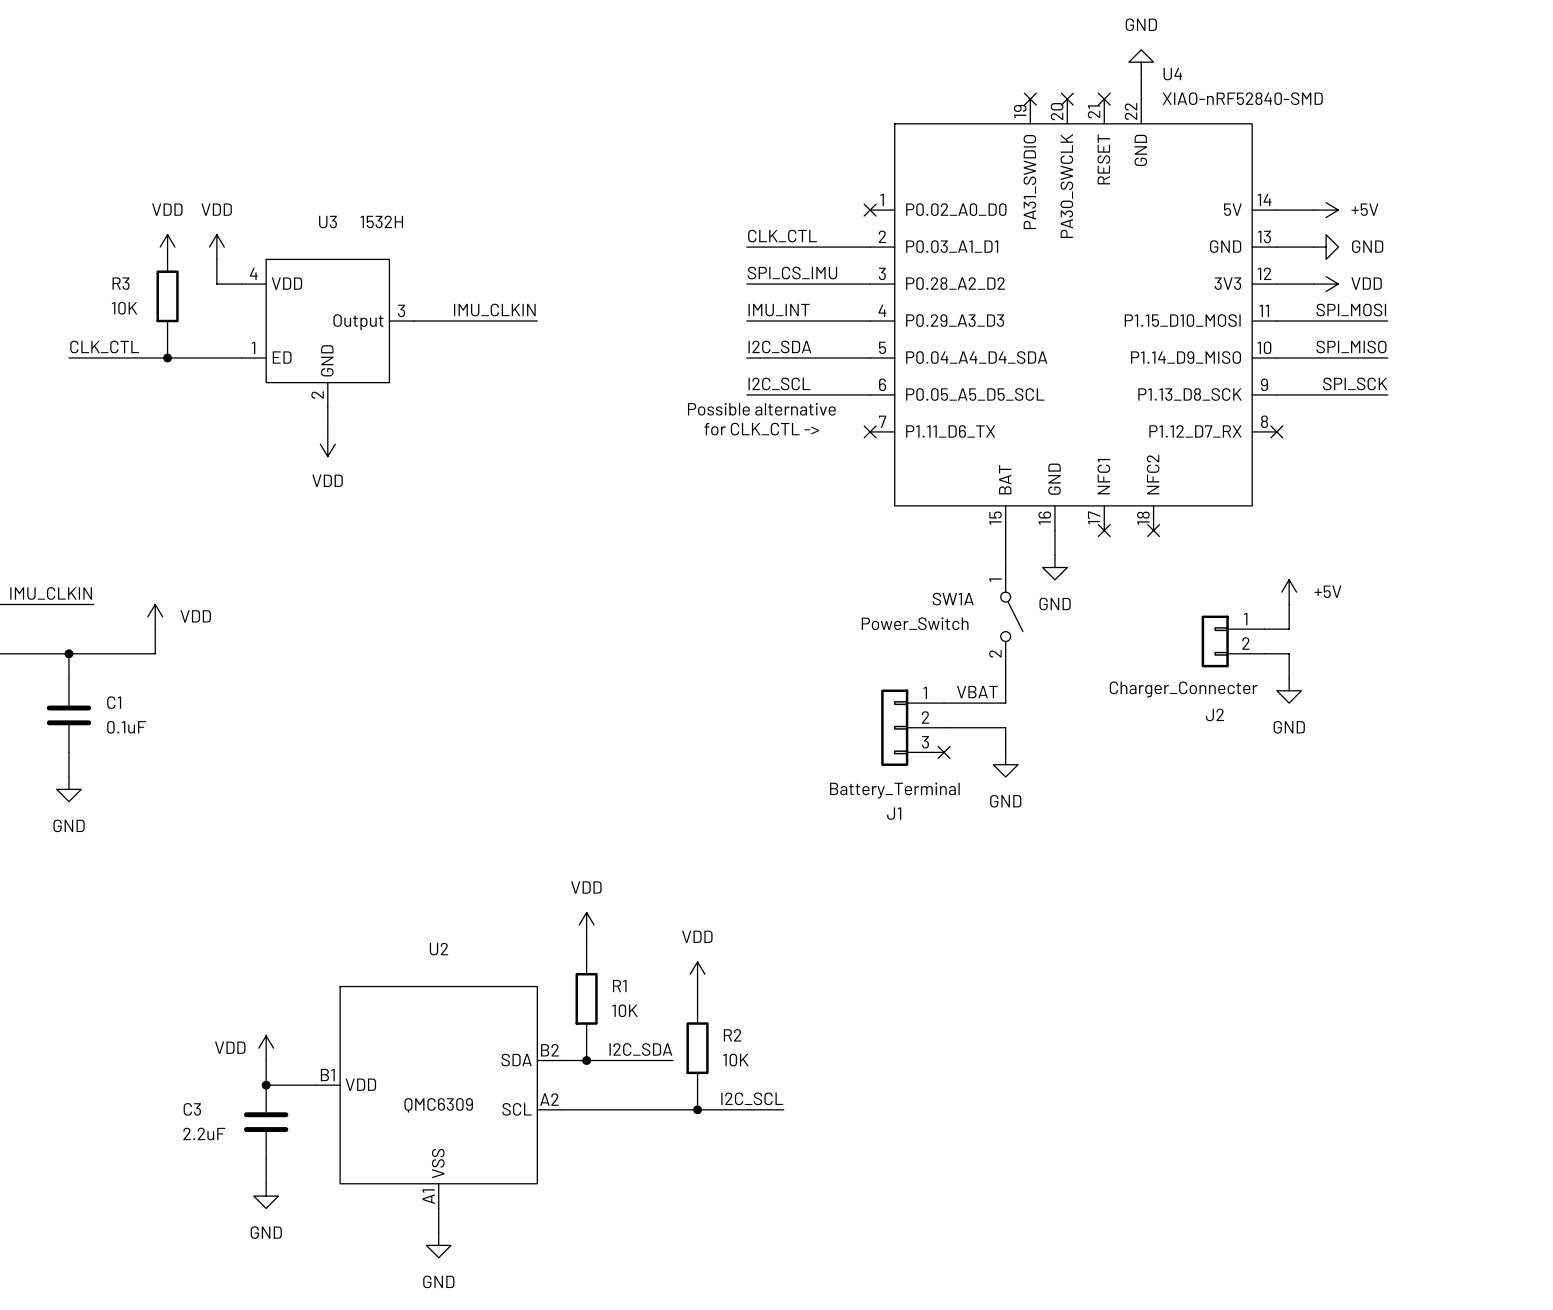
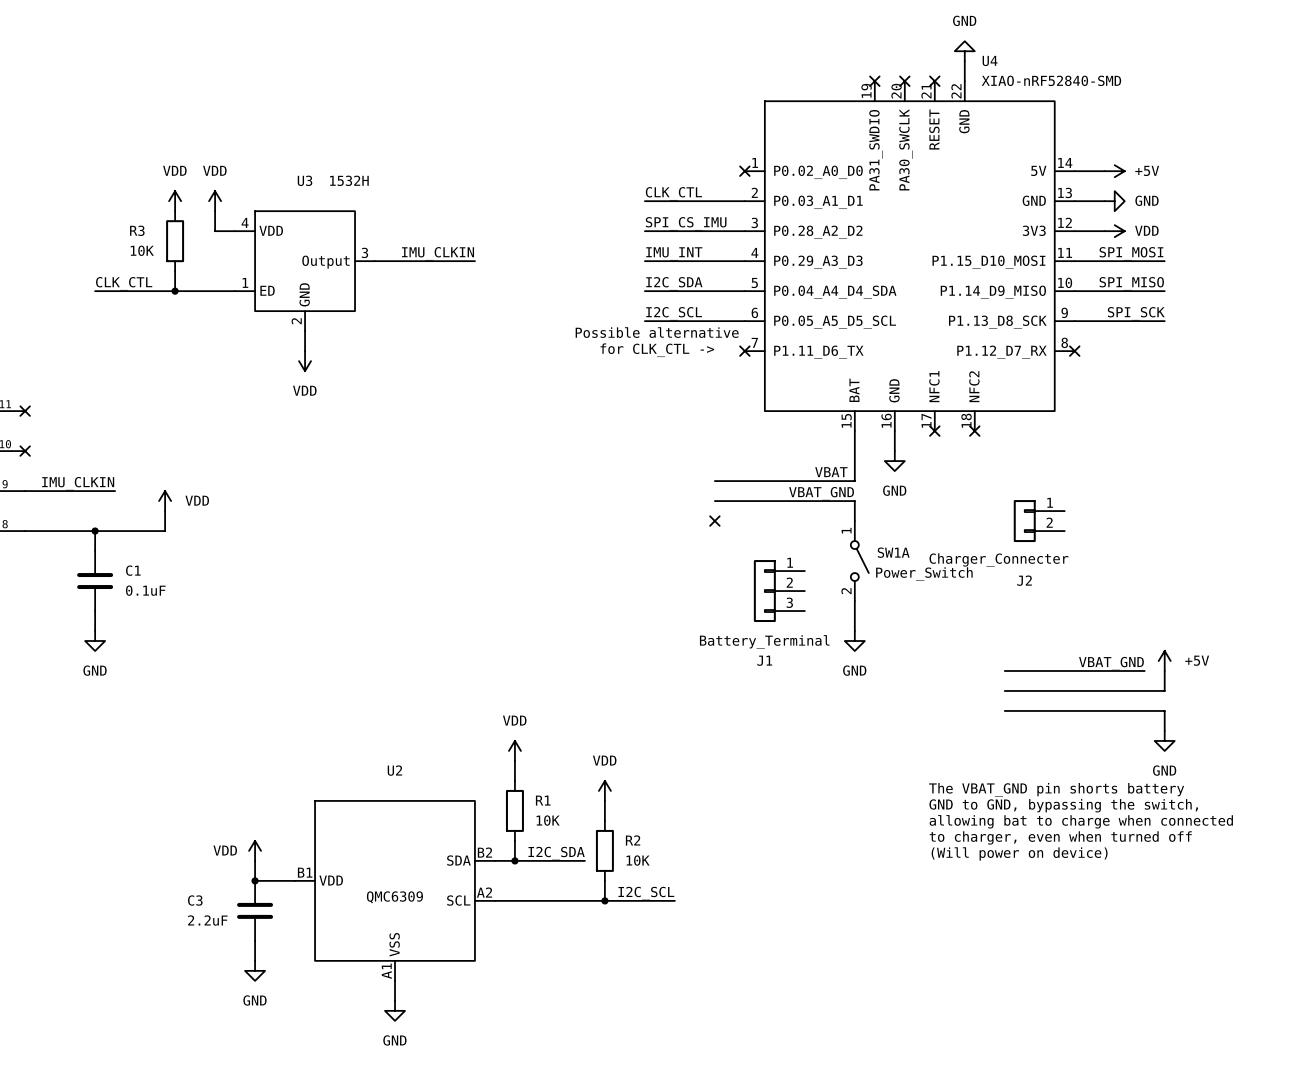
wire: none -> (854, 461) (854, 481) (714, 481)
power symbol: +5V (1289, 592) -> none
SW1A name position: SW1A (953, 599) -> SW1A (893, 552)
wire: (1289, 604) (1289, 629) (1264, 629) -> none
label: none -> VBAT_GND (821, 493)
wire: none -> (714, 501) (854, 501) (854, 521)
SW1A position: (1011, 616) -> (859, 561)
SW1A value position: Power_Switch (915, 623) -> Power_Switch (924, 574)
no-connect mark: none -> (714, 521)
wire: (1264, 653) (1289, 653) (1289, 678) -> none
wire: (1005, 666) (1005, 703) (944, 703) -> none
power symbol: GND (1289, 690) -> none
label position: VBAT (977, 692) -> VBAT (831, 472)
wire: (944, 727) (1005, 727) (1005, 740) -> none
no-connect mark: (944, 752) -> none
power symbol position: GND (1005, 764) -> GND (854, 641)
power symbol: none -> +5V (1164, 660)
label: none -> VBAT_GND (1111, 663)
wire: none -> (1004, 670) (1144, 670)
wire: none -> (1164, 670) (1164, 690) (1004, 690)
wire: none -> (1004, 710) (1164, 710) (1164, 730)
power symbol: none -> GND (1164, 740)
text: none -> The VBAT_GND pin shorts battery (1056, 789)
text: none -> GND to GND, bypassing the switch, (1063, 805)
text: none -> allowing bat to charge when connected (1081, 821)
text: none -> to charger, even when turned off (1060, 837)
text: none -> (Will power on device) (1019, 853)

